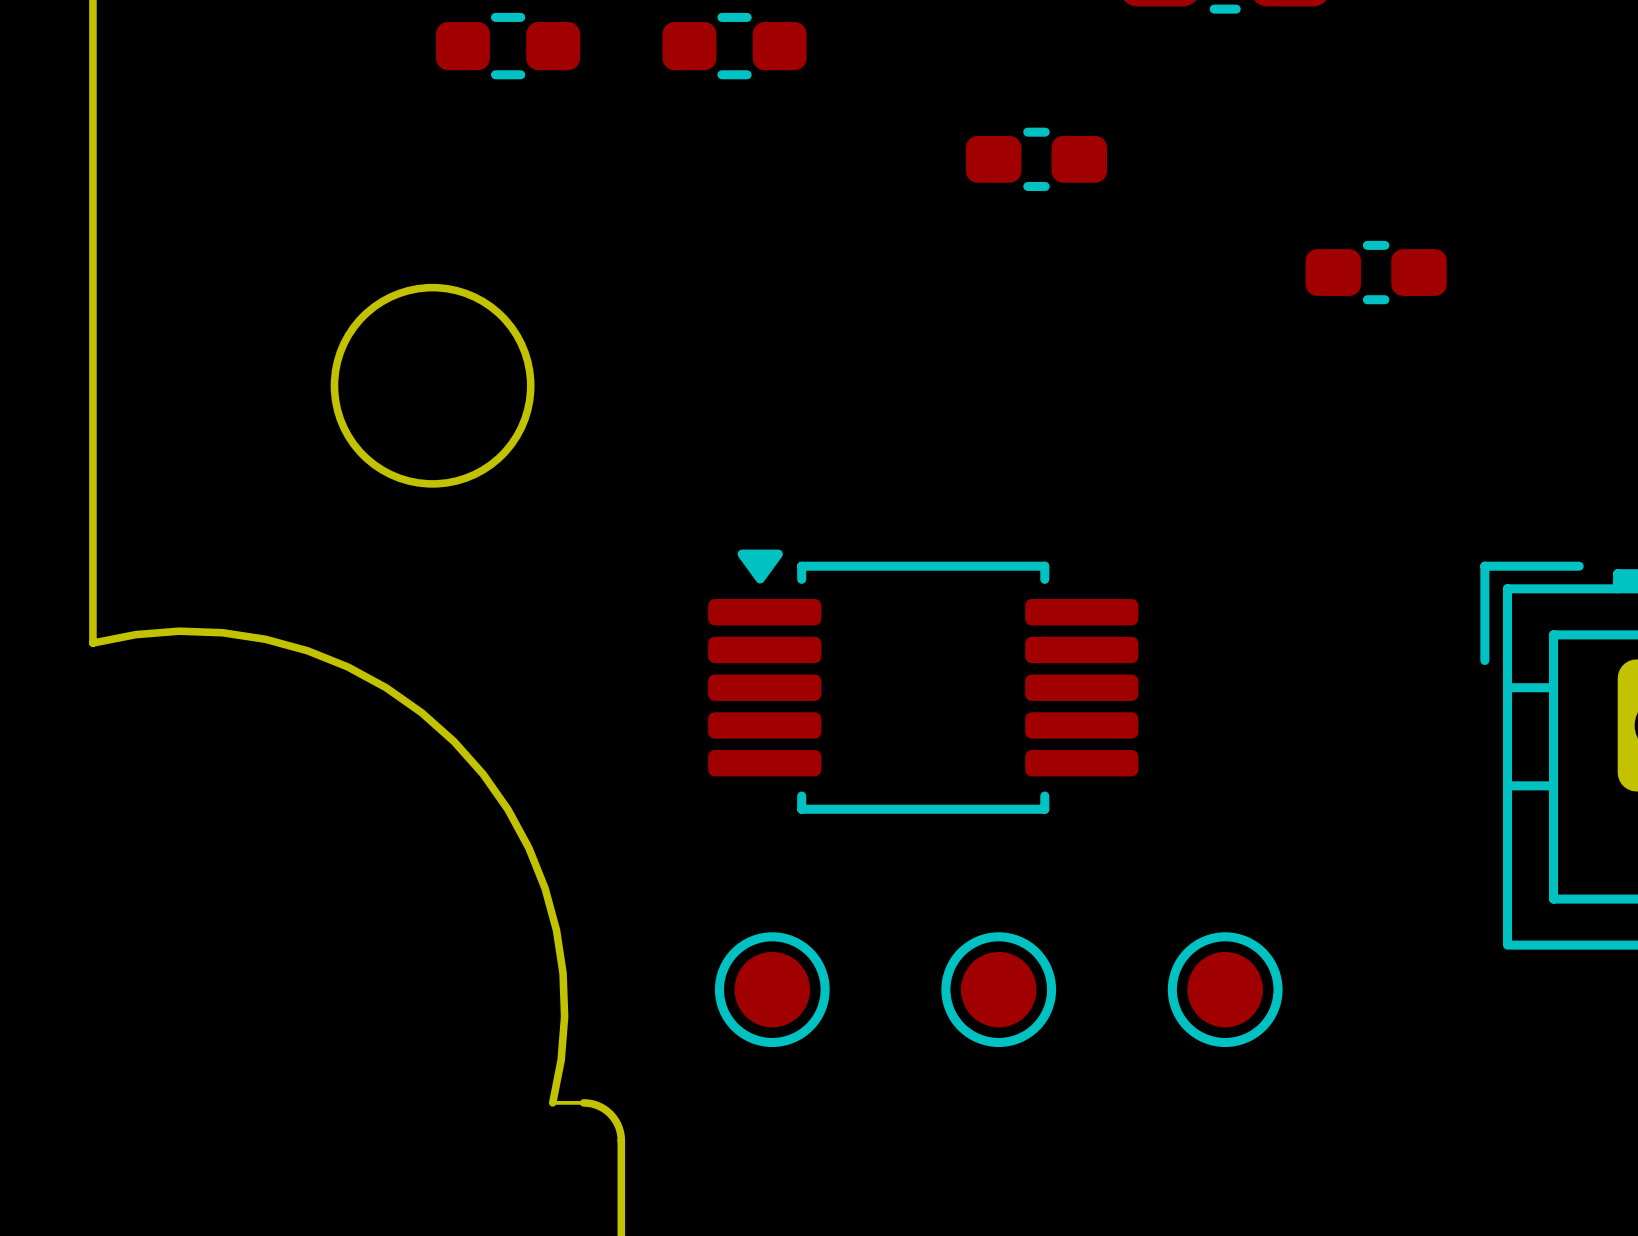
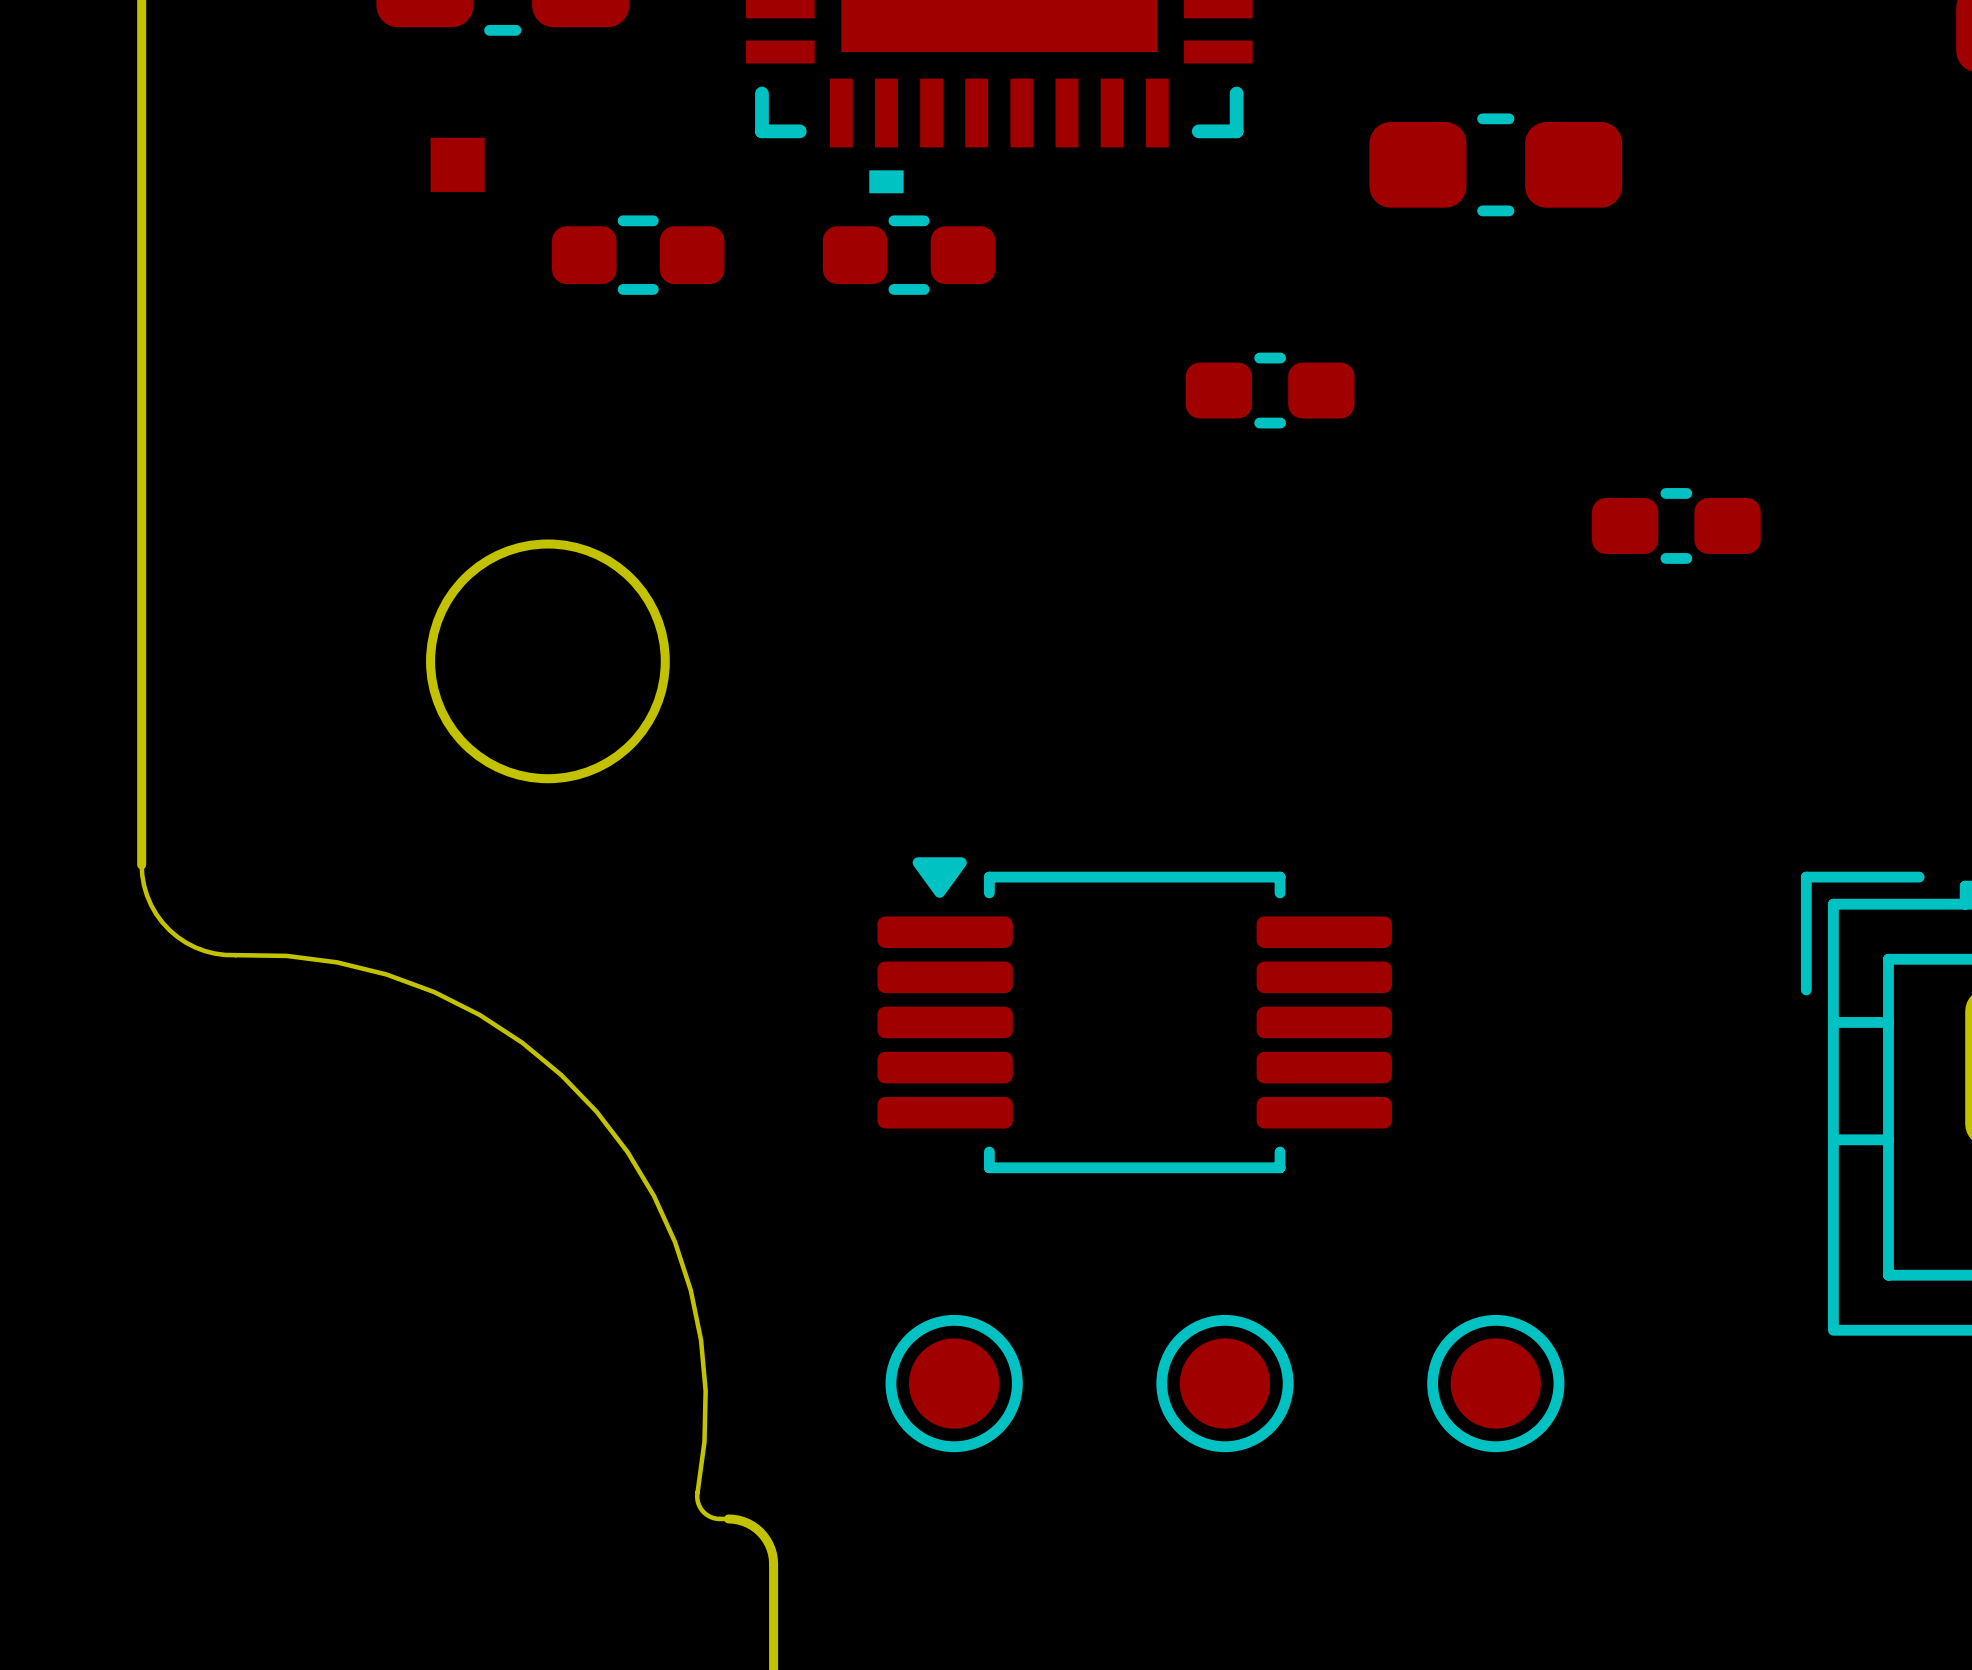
board edge: (92, 556) (92, 643) (135, 634) (178, 631) (222, 632) (265, 639) (307, 650) (347, 666) (386, 687) (421, 712) (454, 741) (483, 774) (508, 809) (528, 847) (545, 888) (556, 930) (563, 973) (564, 1016) (561, 1060) (552, 1102) (576, 1102) -> (141, 864) (144, 885) (151, 905) (169, 930) (186, 942) (204, 951) (225, 954) (286, 955) (337, 962) (386, 974) (434, 992) (479, 1014) (522, 1042) (561, 1075) (596, 1111) (627, 1152) (653, 1195) (675, 1242) (690, 1290) (701, 1340) (705, 1390) (704, 1441) (697, 1500) (700, 1508) (706, 1514) (719, 1518)

